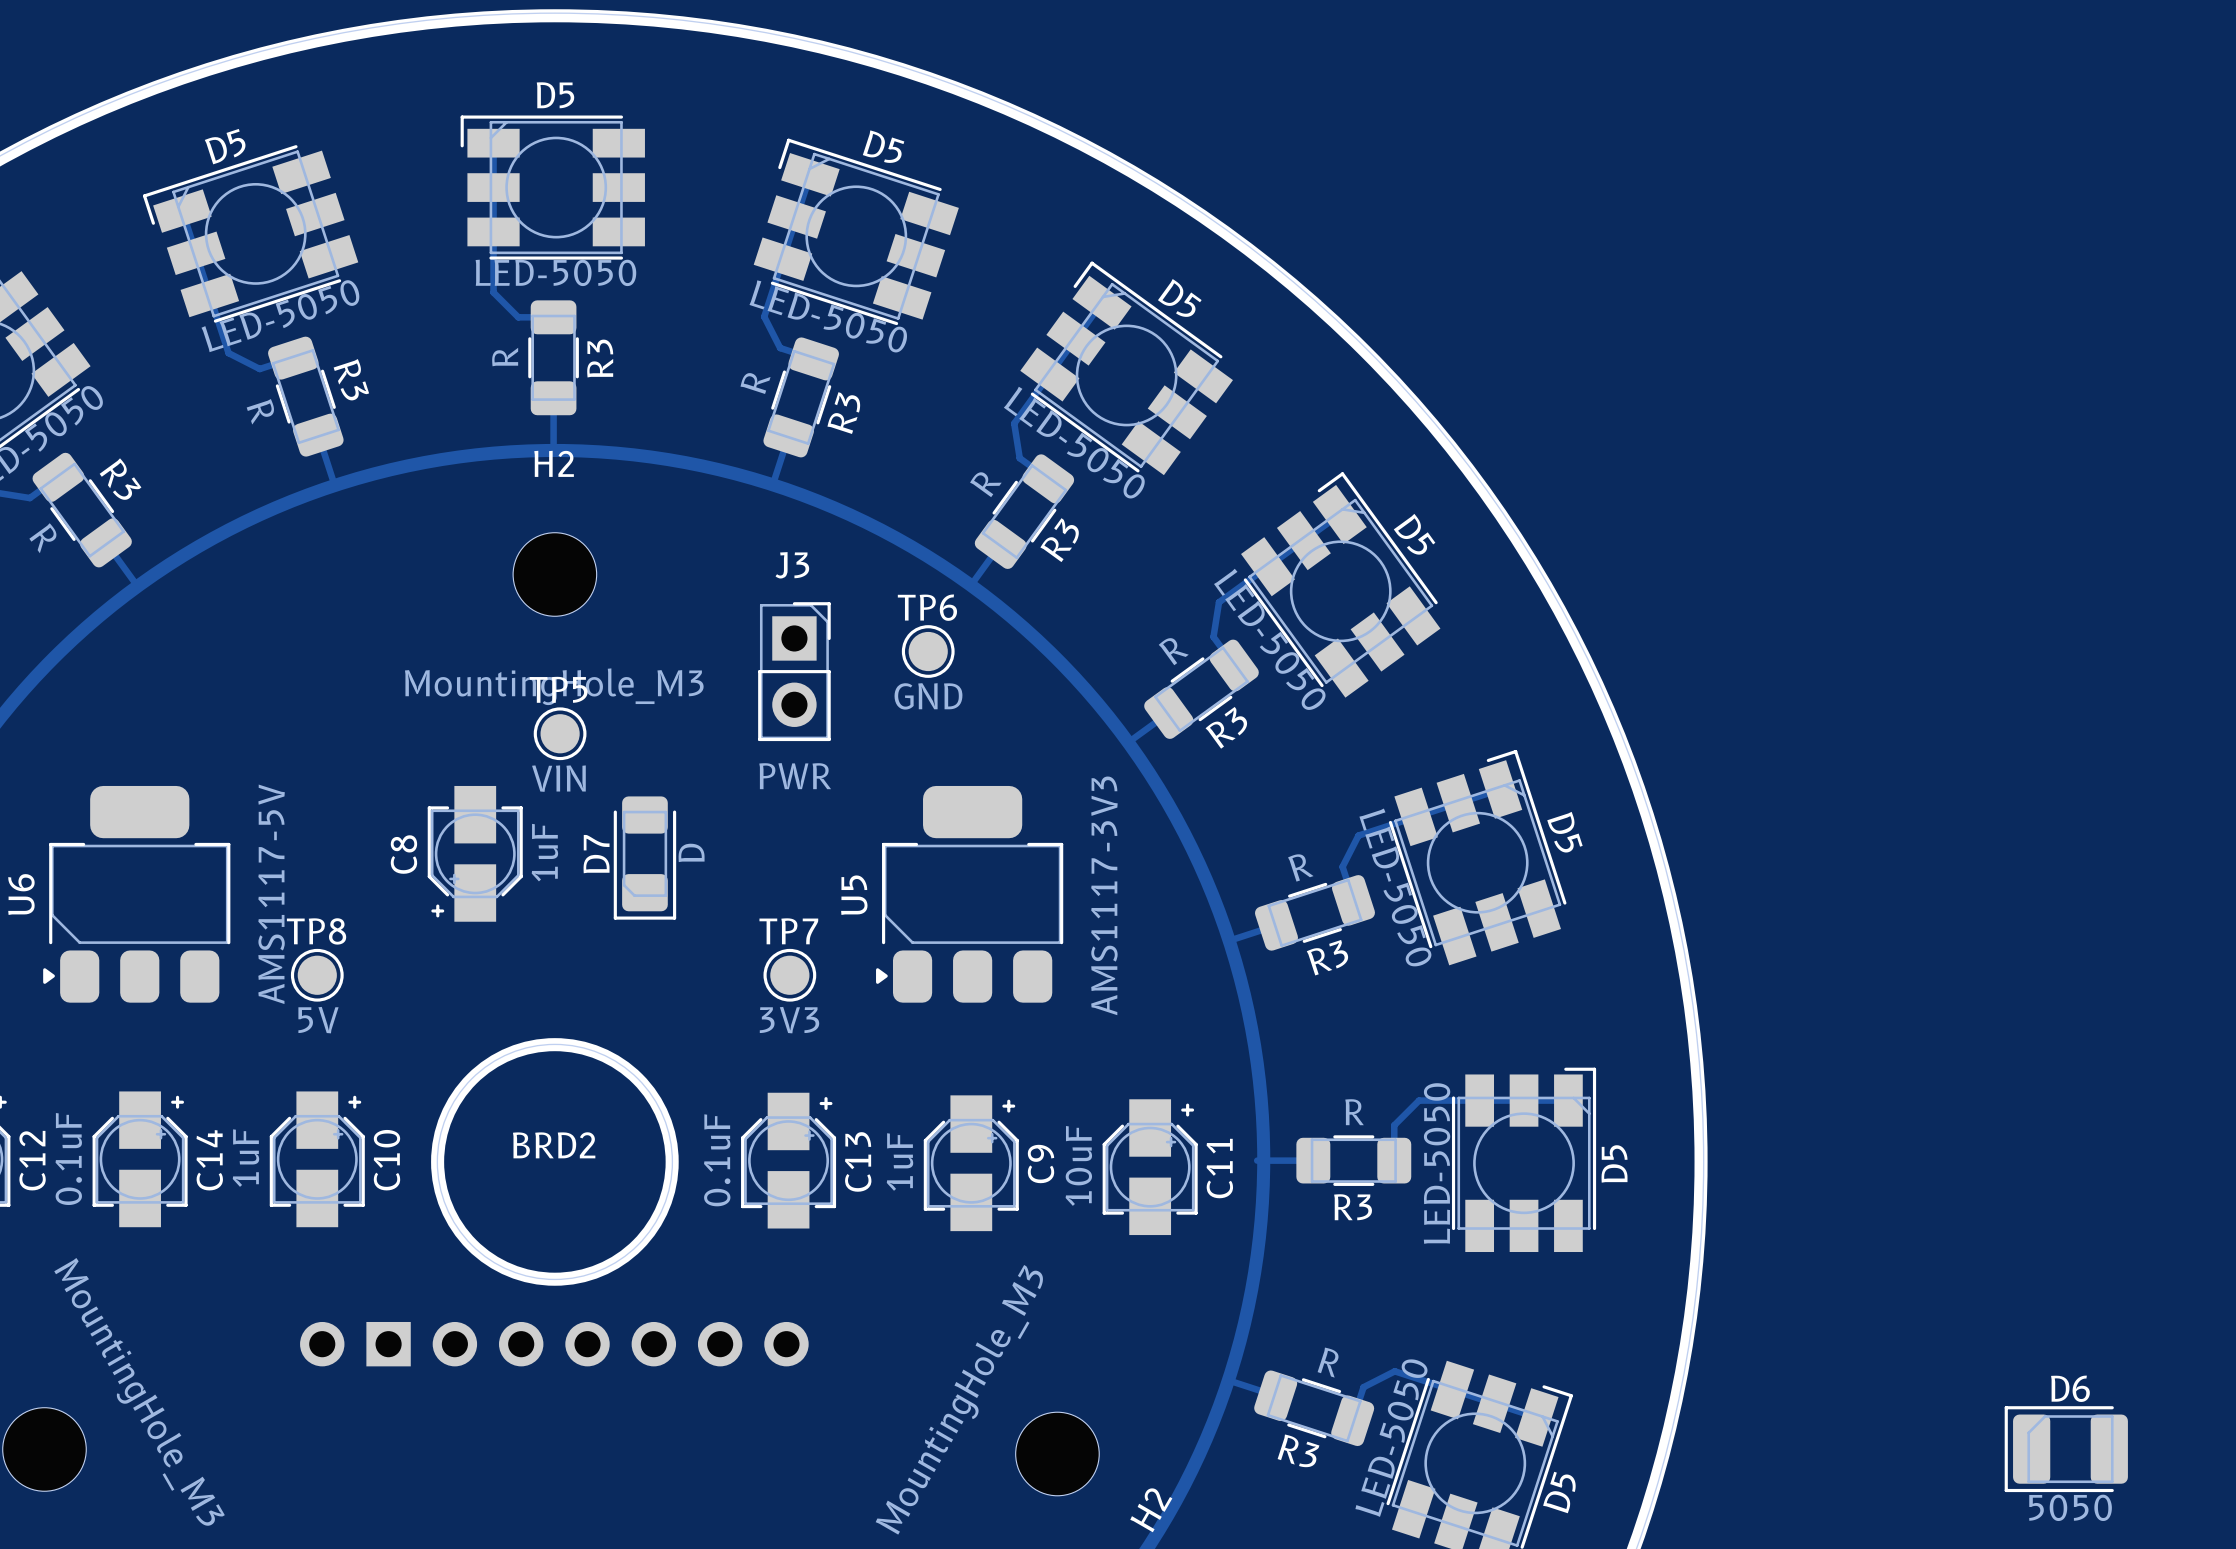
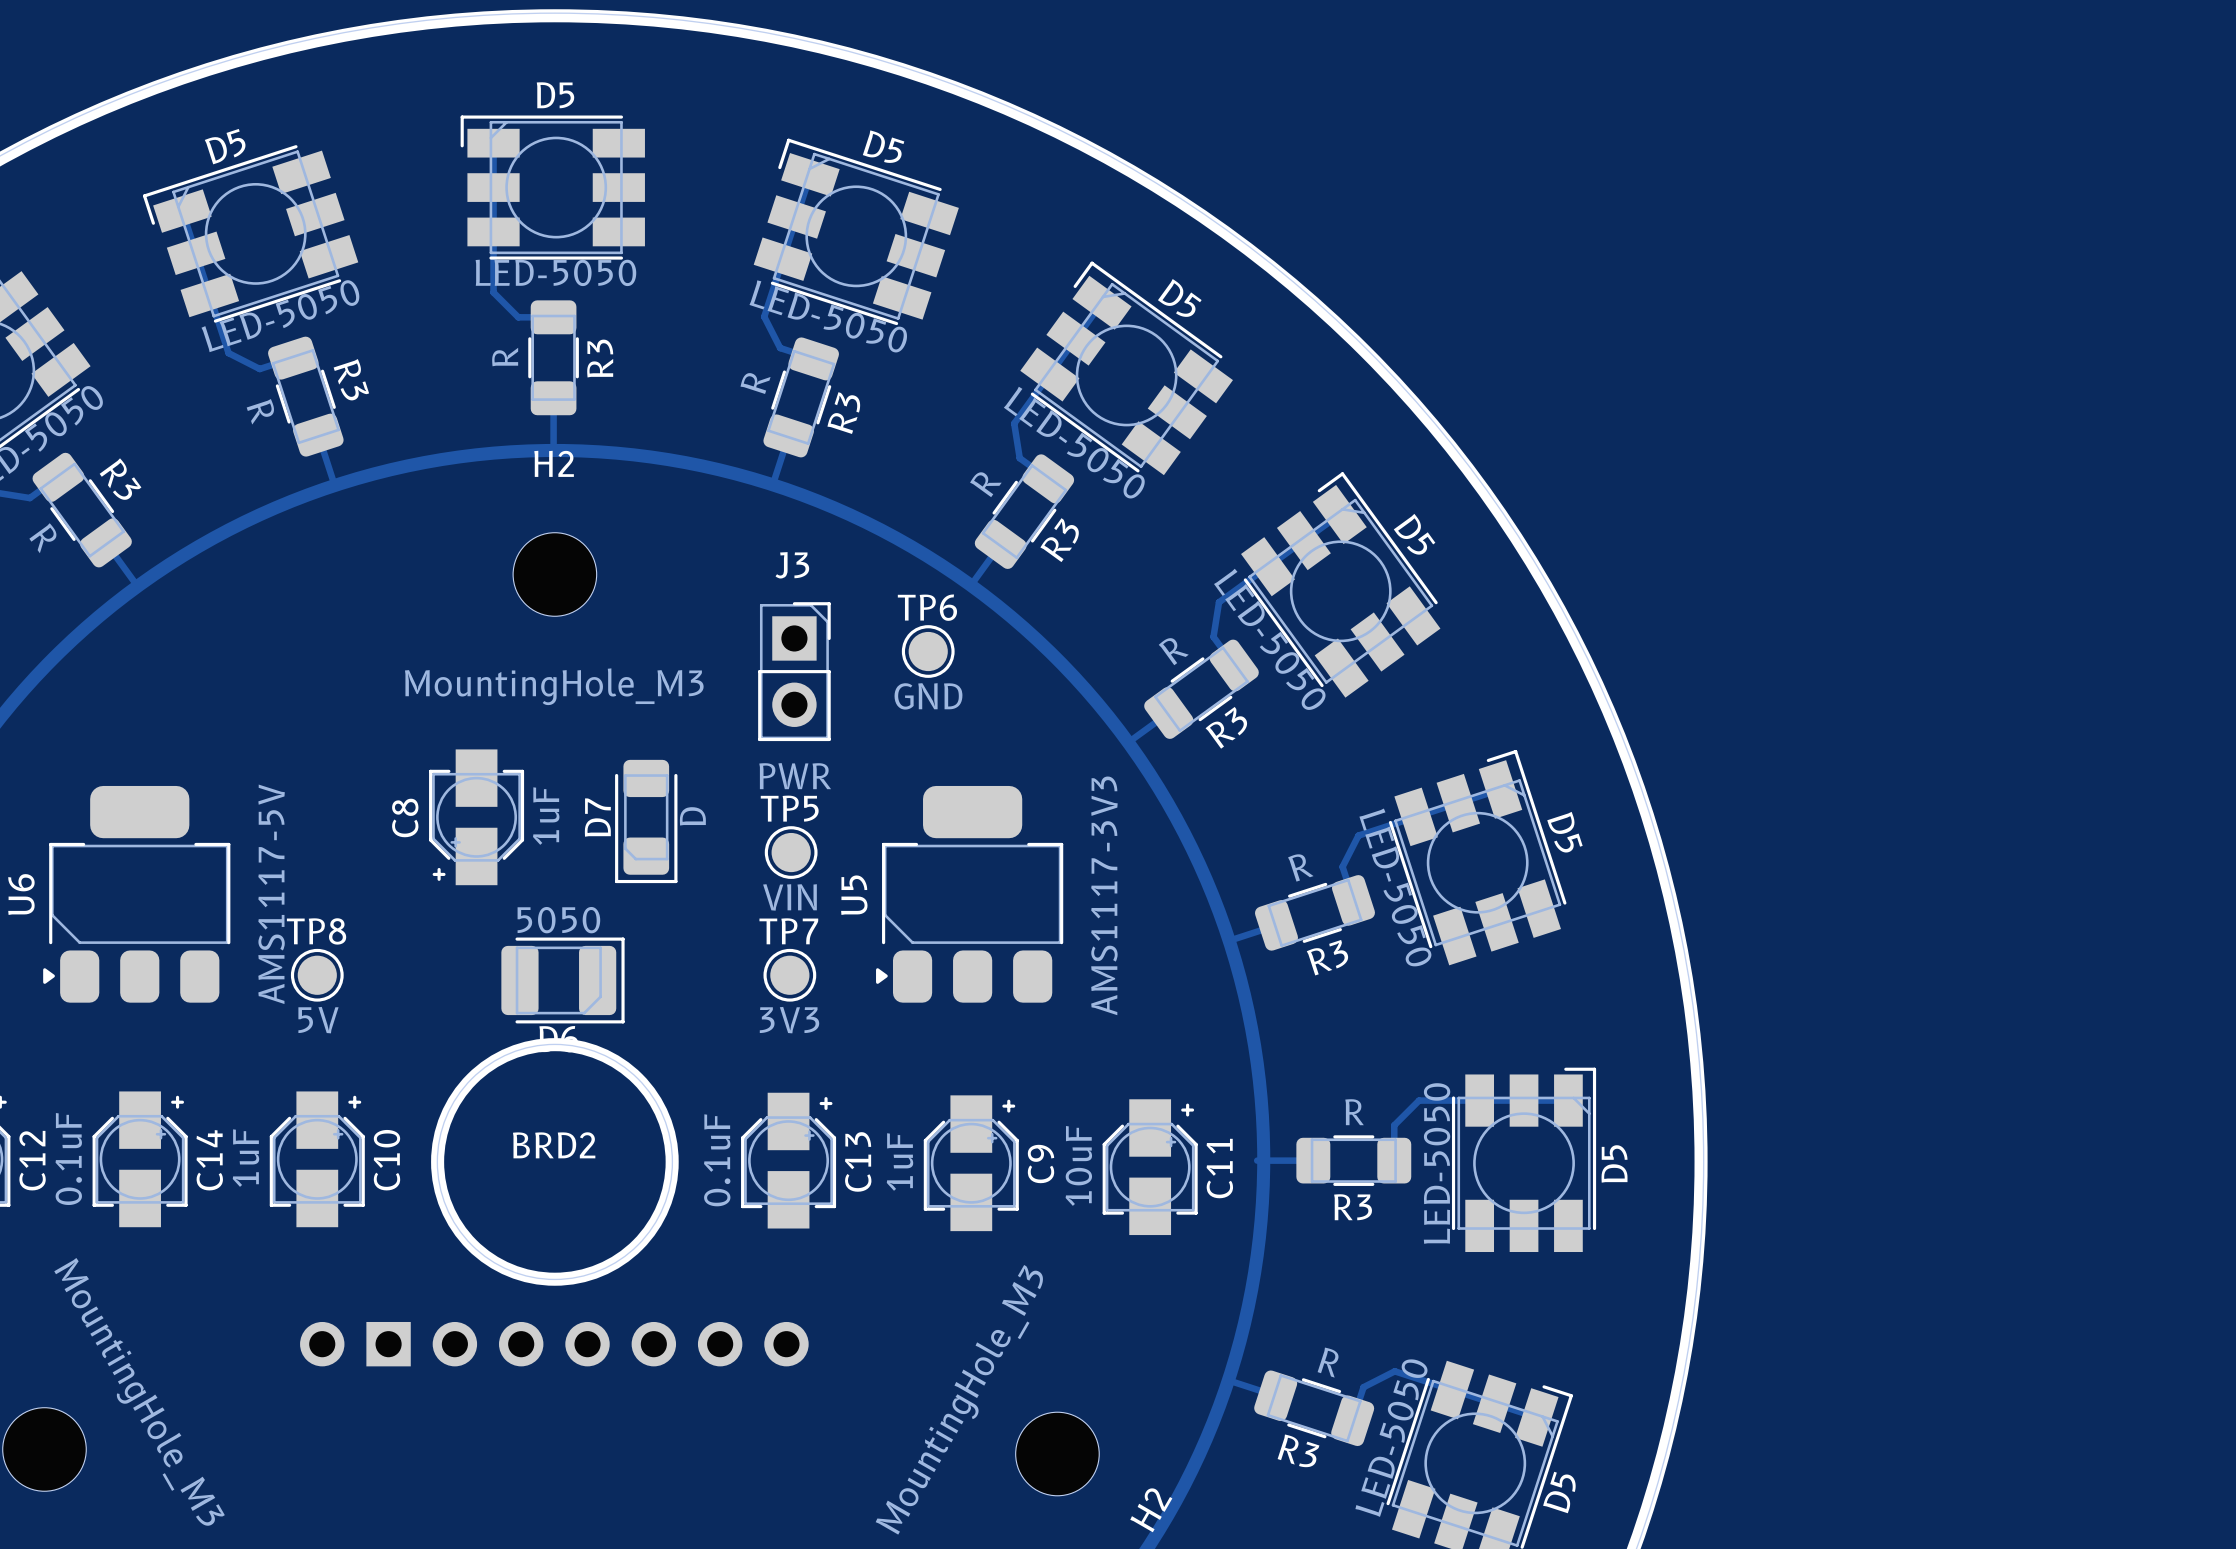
TP5 position: (560, 733) -> (791, 852)
C8 position: (475, 853) -> (476, 817)
D7 position: (644, 858) -> (646, 821)
D6 rotation: 0° (2066, 1449) -> 180° (562, 980)
D6 position: (2066, 1449) -> (562, 980)

